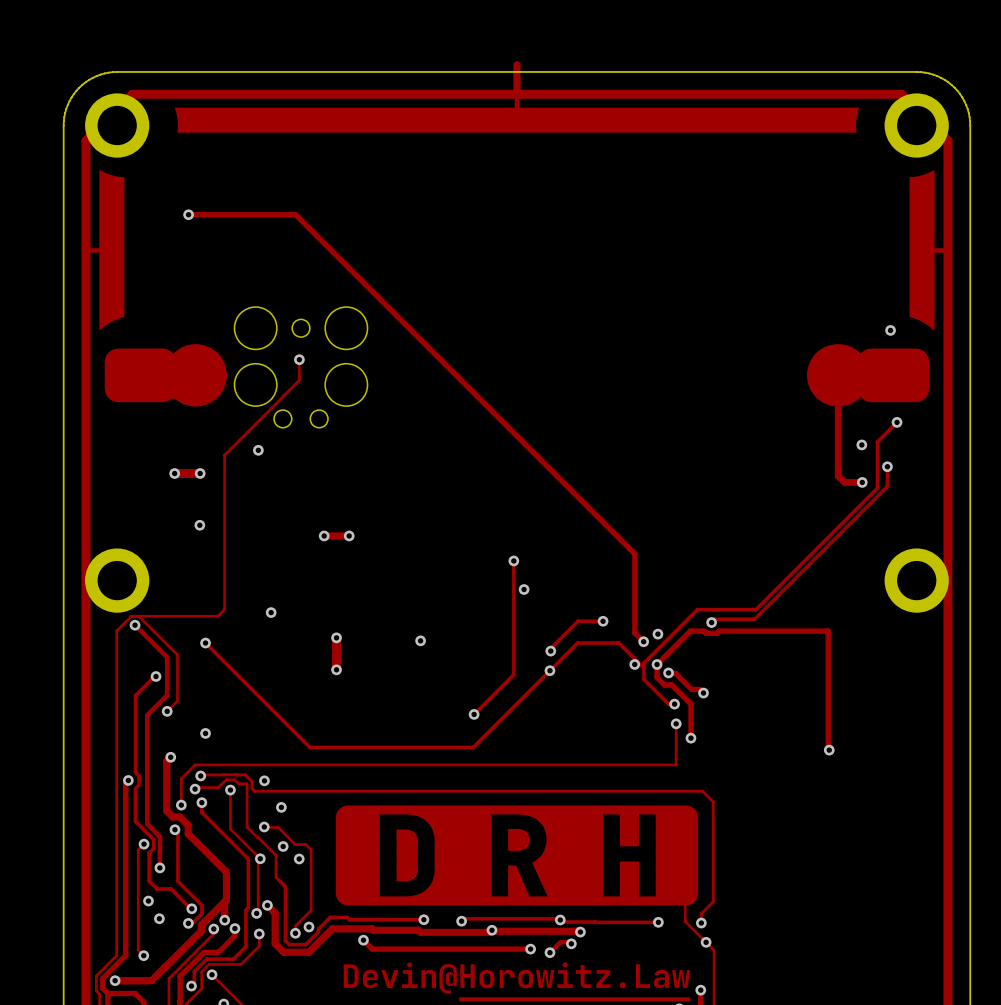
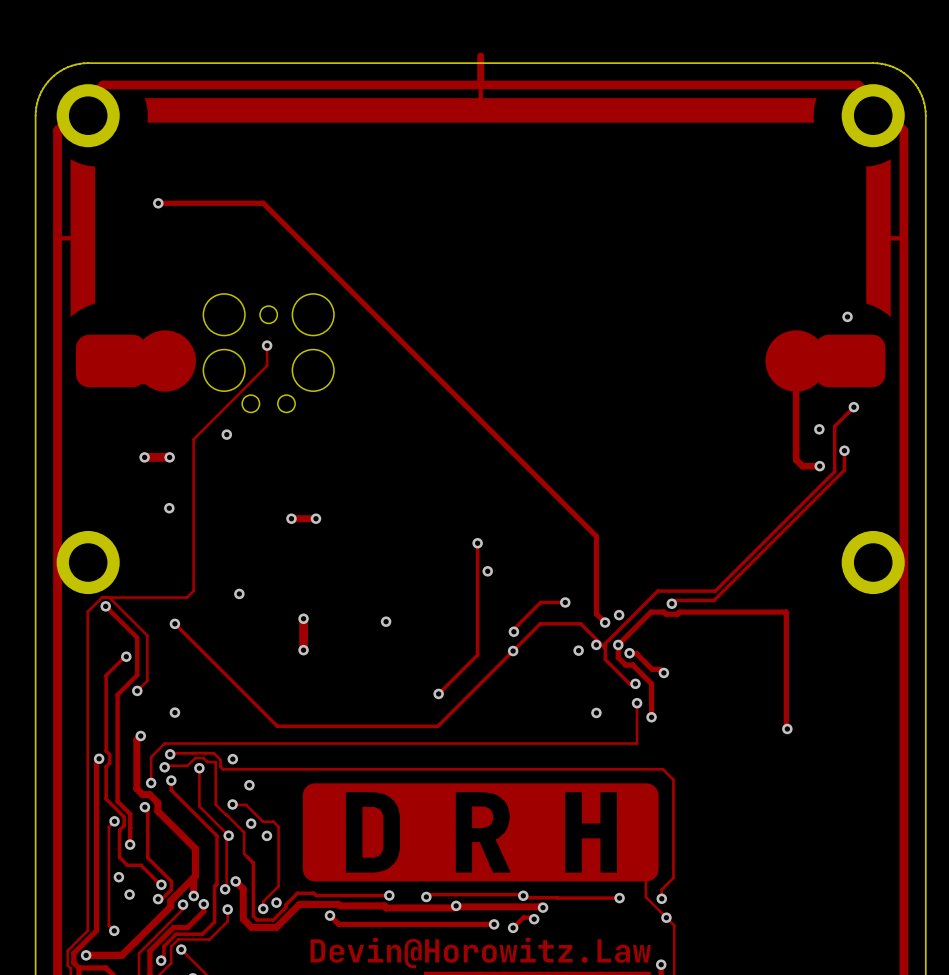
via: none -> (578, 650)
via: none -> (596, 712)

